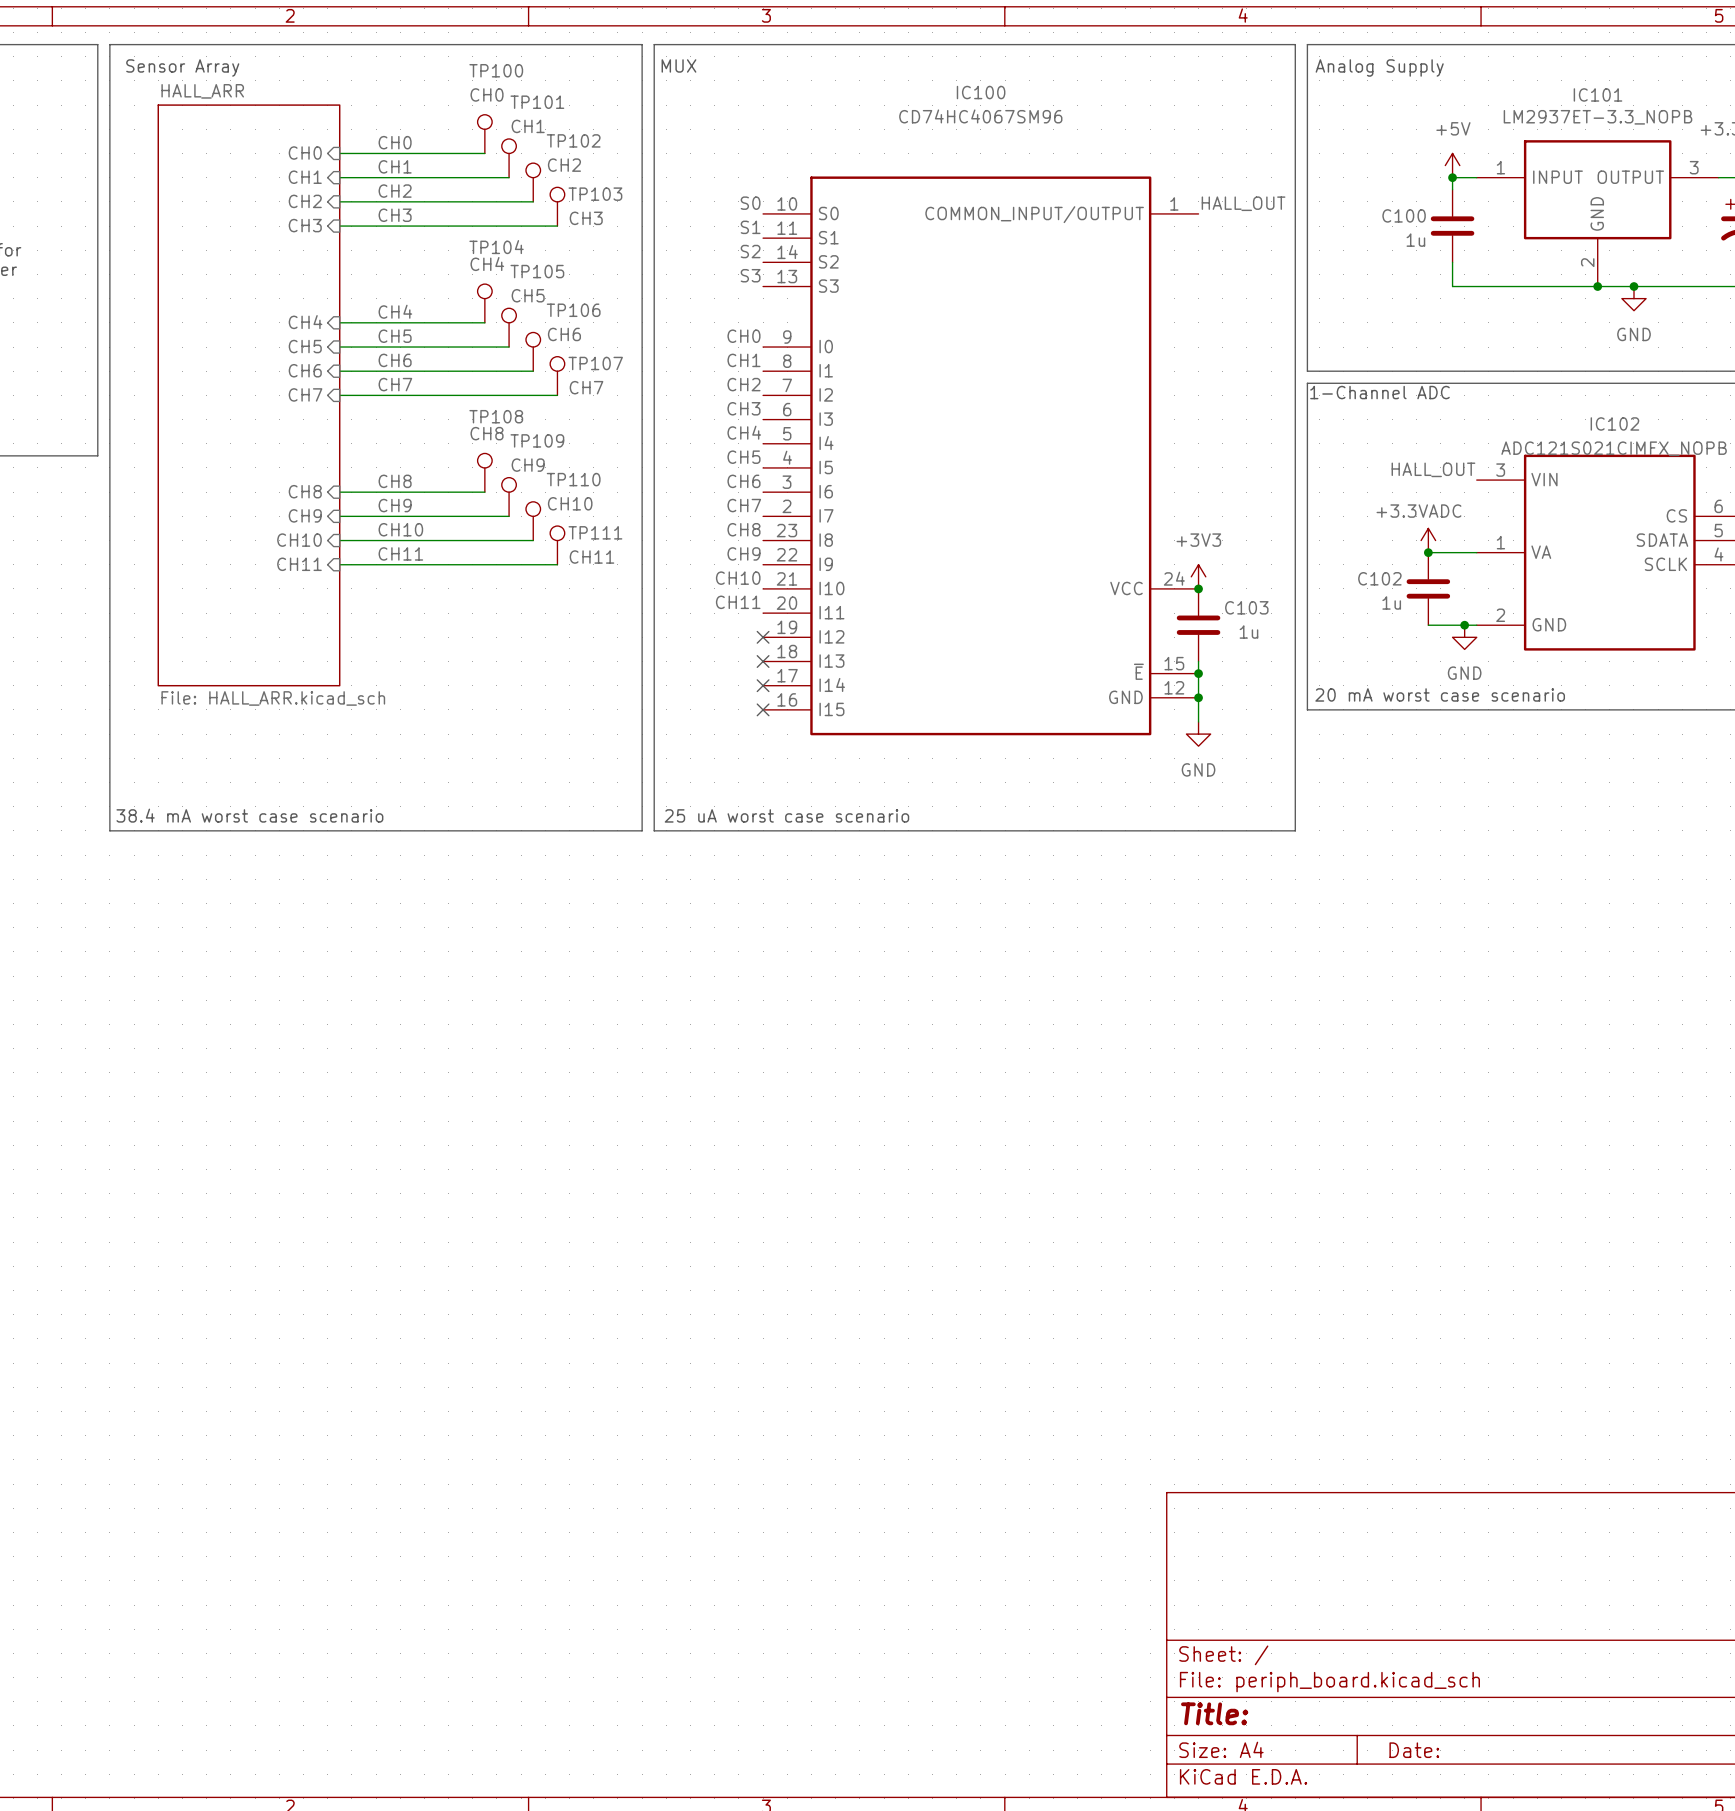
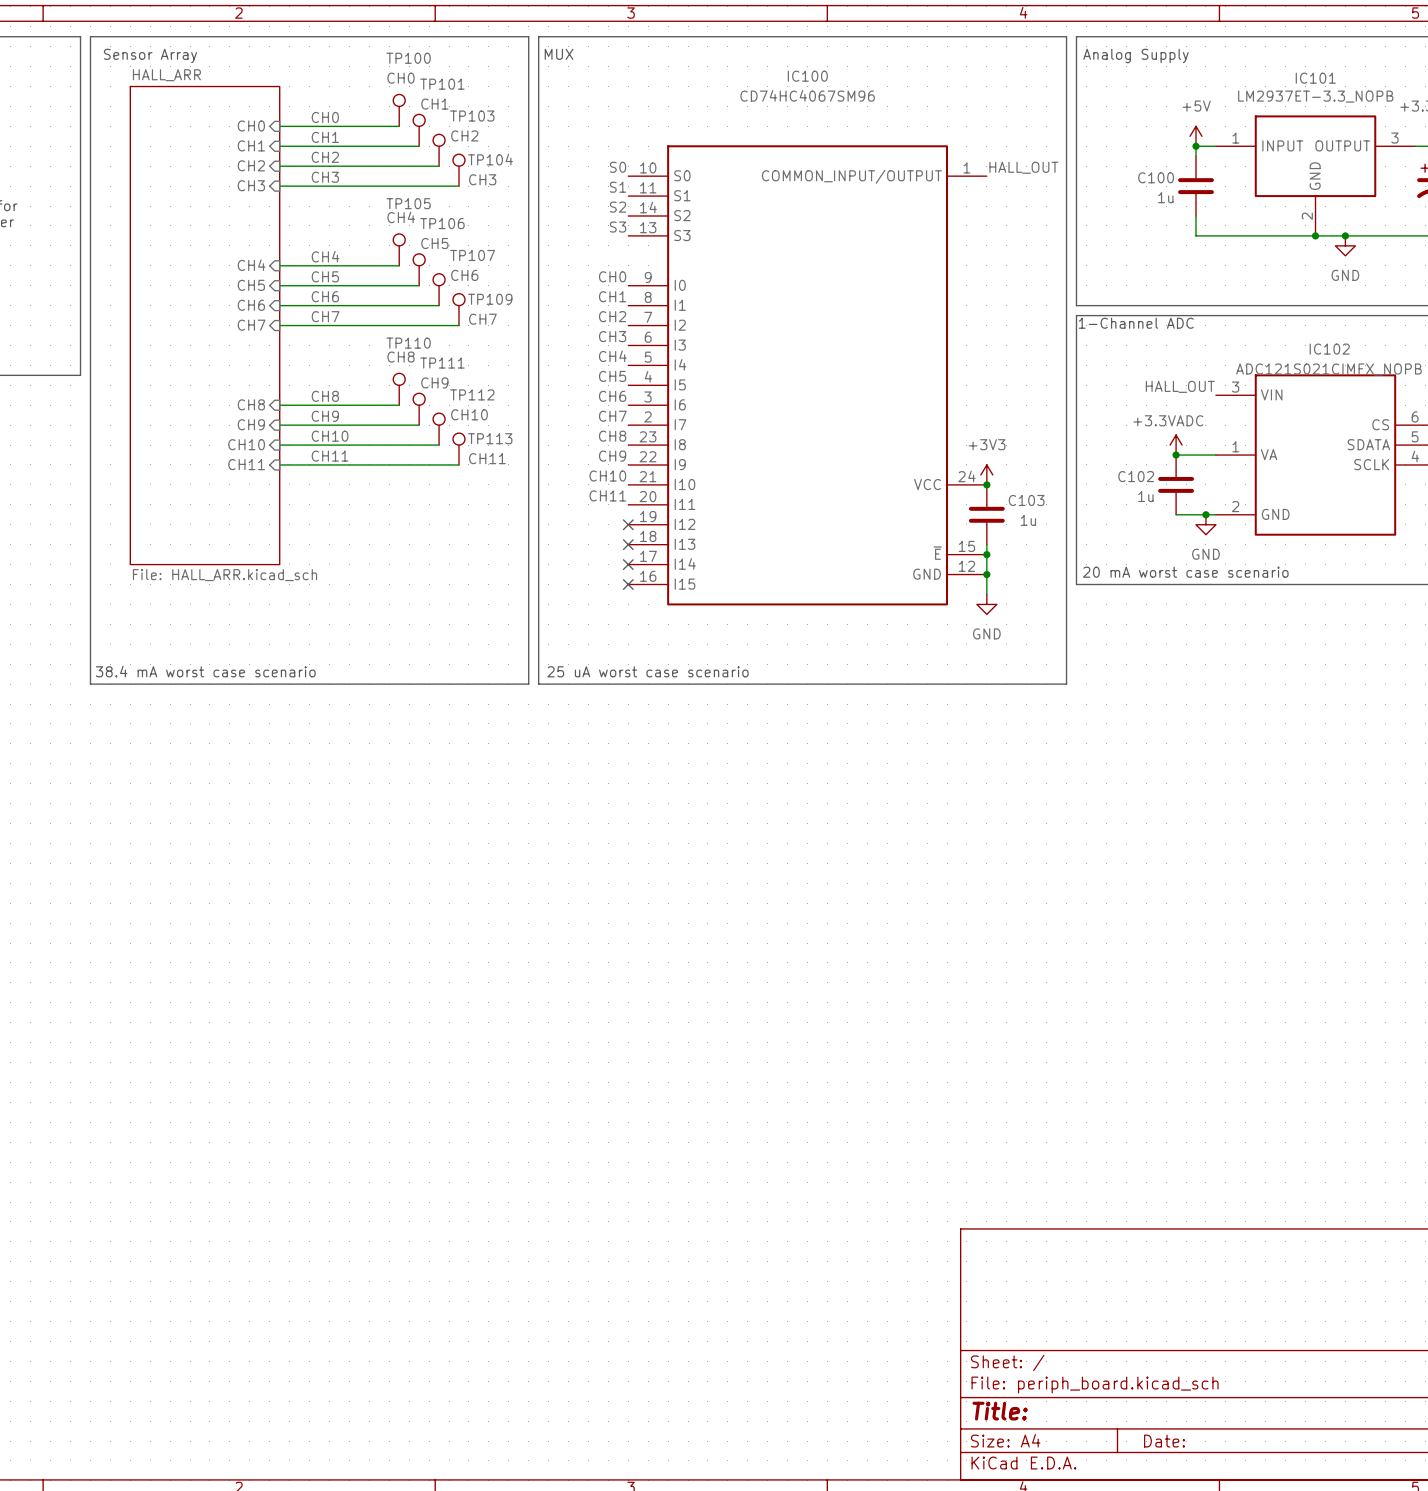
TP102 name: TP102 (573, 140) -> TP103 (472, 116)
TP103 name: TP103 (595, 194) -> TP104 (490, 159)
TP104 name: TP104 (496, 247) -> TP105 (408, 203)
TP105 name: TP105 (537, 271) -> TP106 (442, 223)
TP106 name: TP106 (573, 310) -> TP107 (472, 255)
TP107 name: TP107 (595, 363) -> TP109 (490, 299)
TP108 name: TP108 (496, 416) -> TP110 (408, 343)
TP109 name: TP109 (537, 440) -> TP111 (442, 363)
TP110 name: TP110 (573, 479) -> TP112 (472, 394)
TP111 name: TP111 (595, 532) -> TP113 (490, 438)

